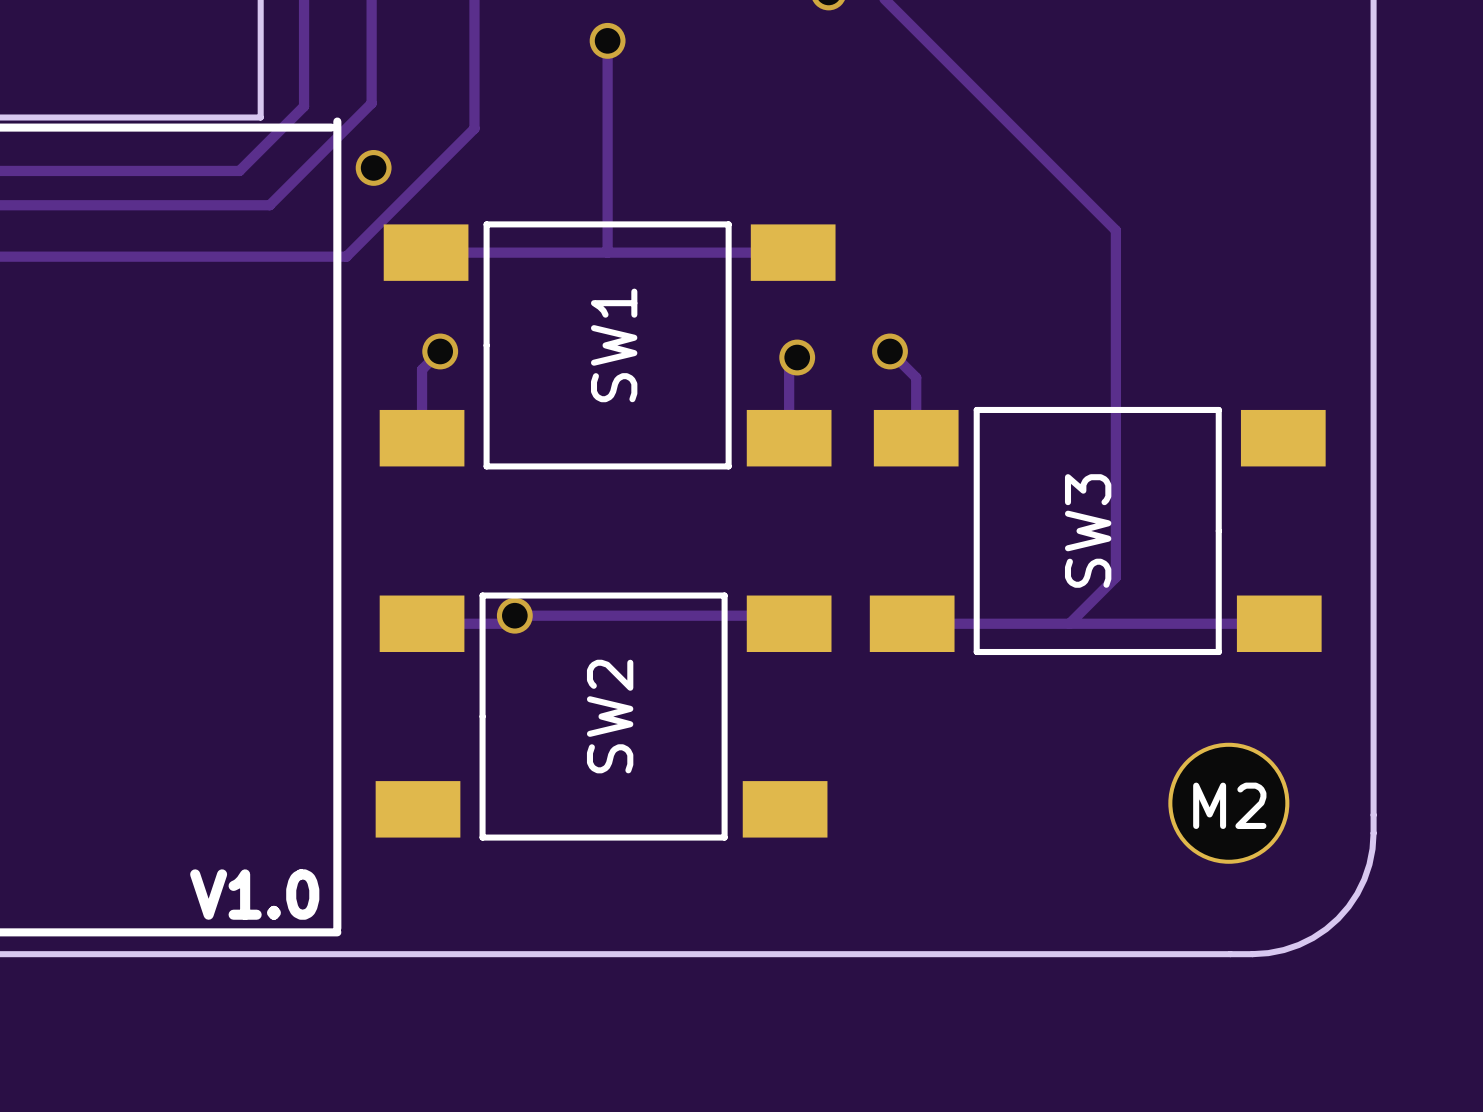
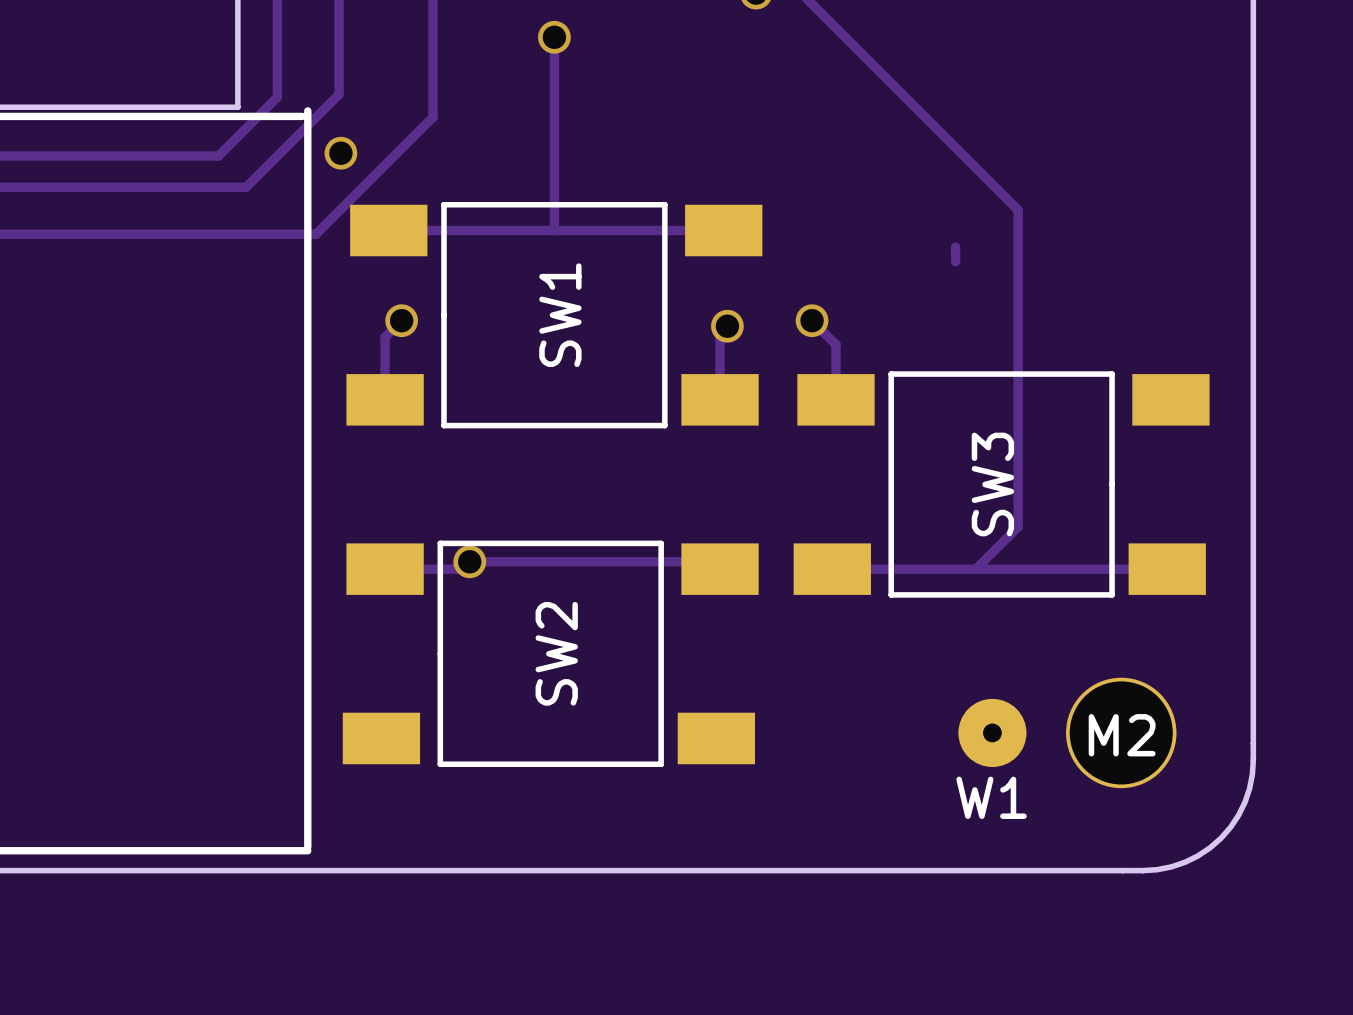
track: none -> (955, 247) (955, 261)
W1: none -> (992, 732)
text: V1.0 (254, 894) -> none

